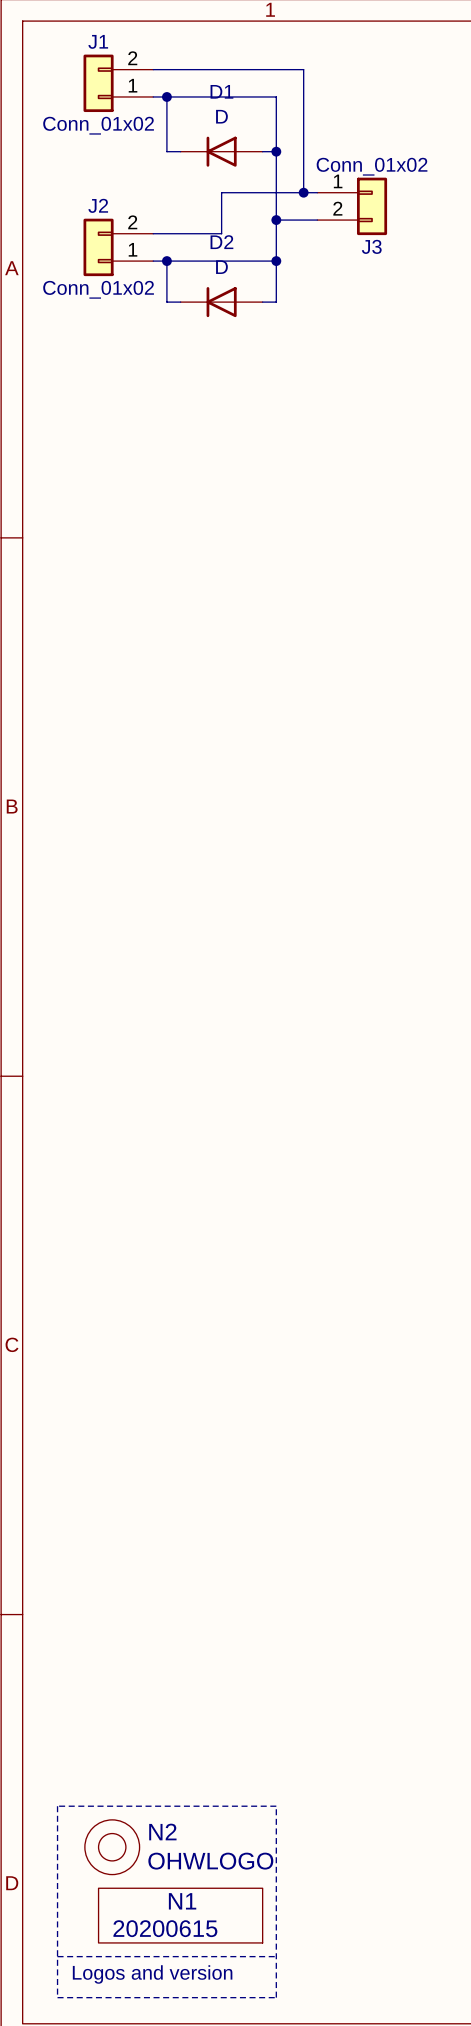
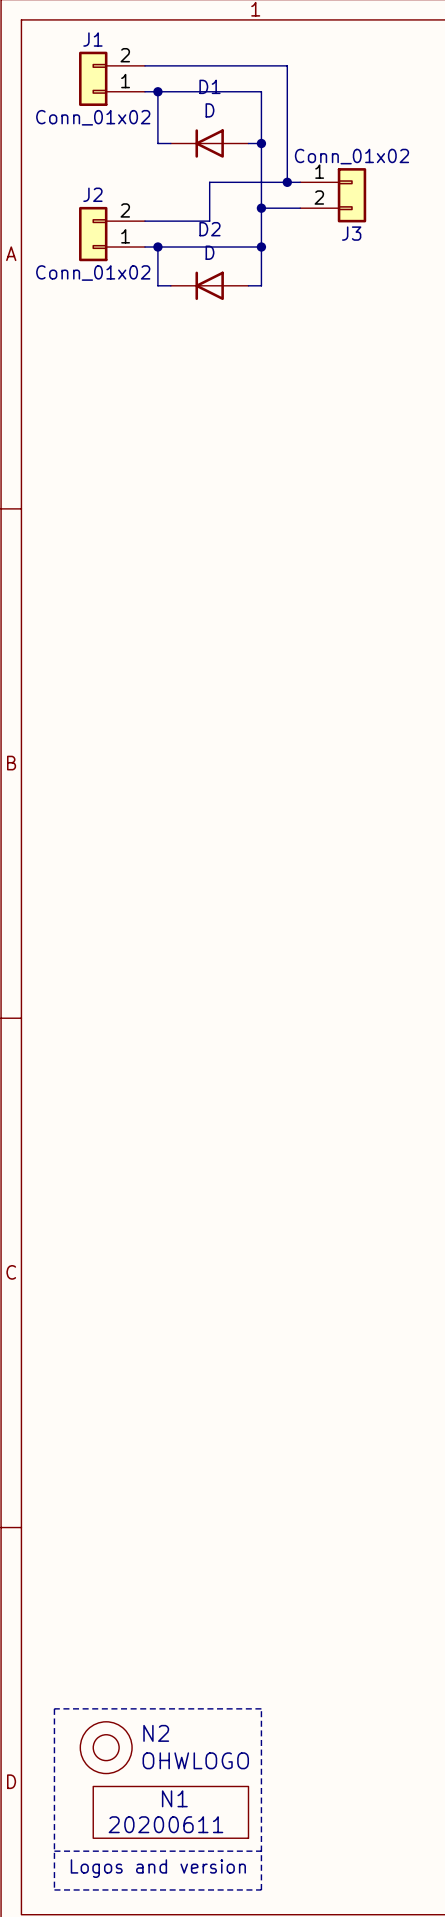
N1 value: 20200615 (165, 1928) -> 20200611 (165, 1824)

